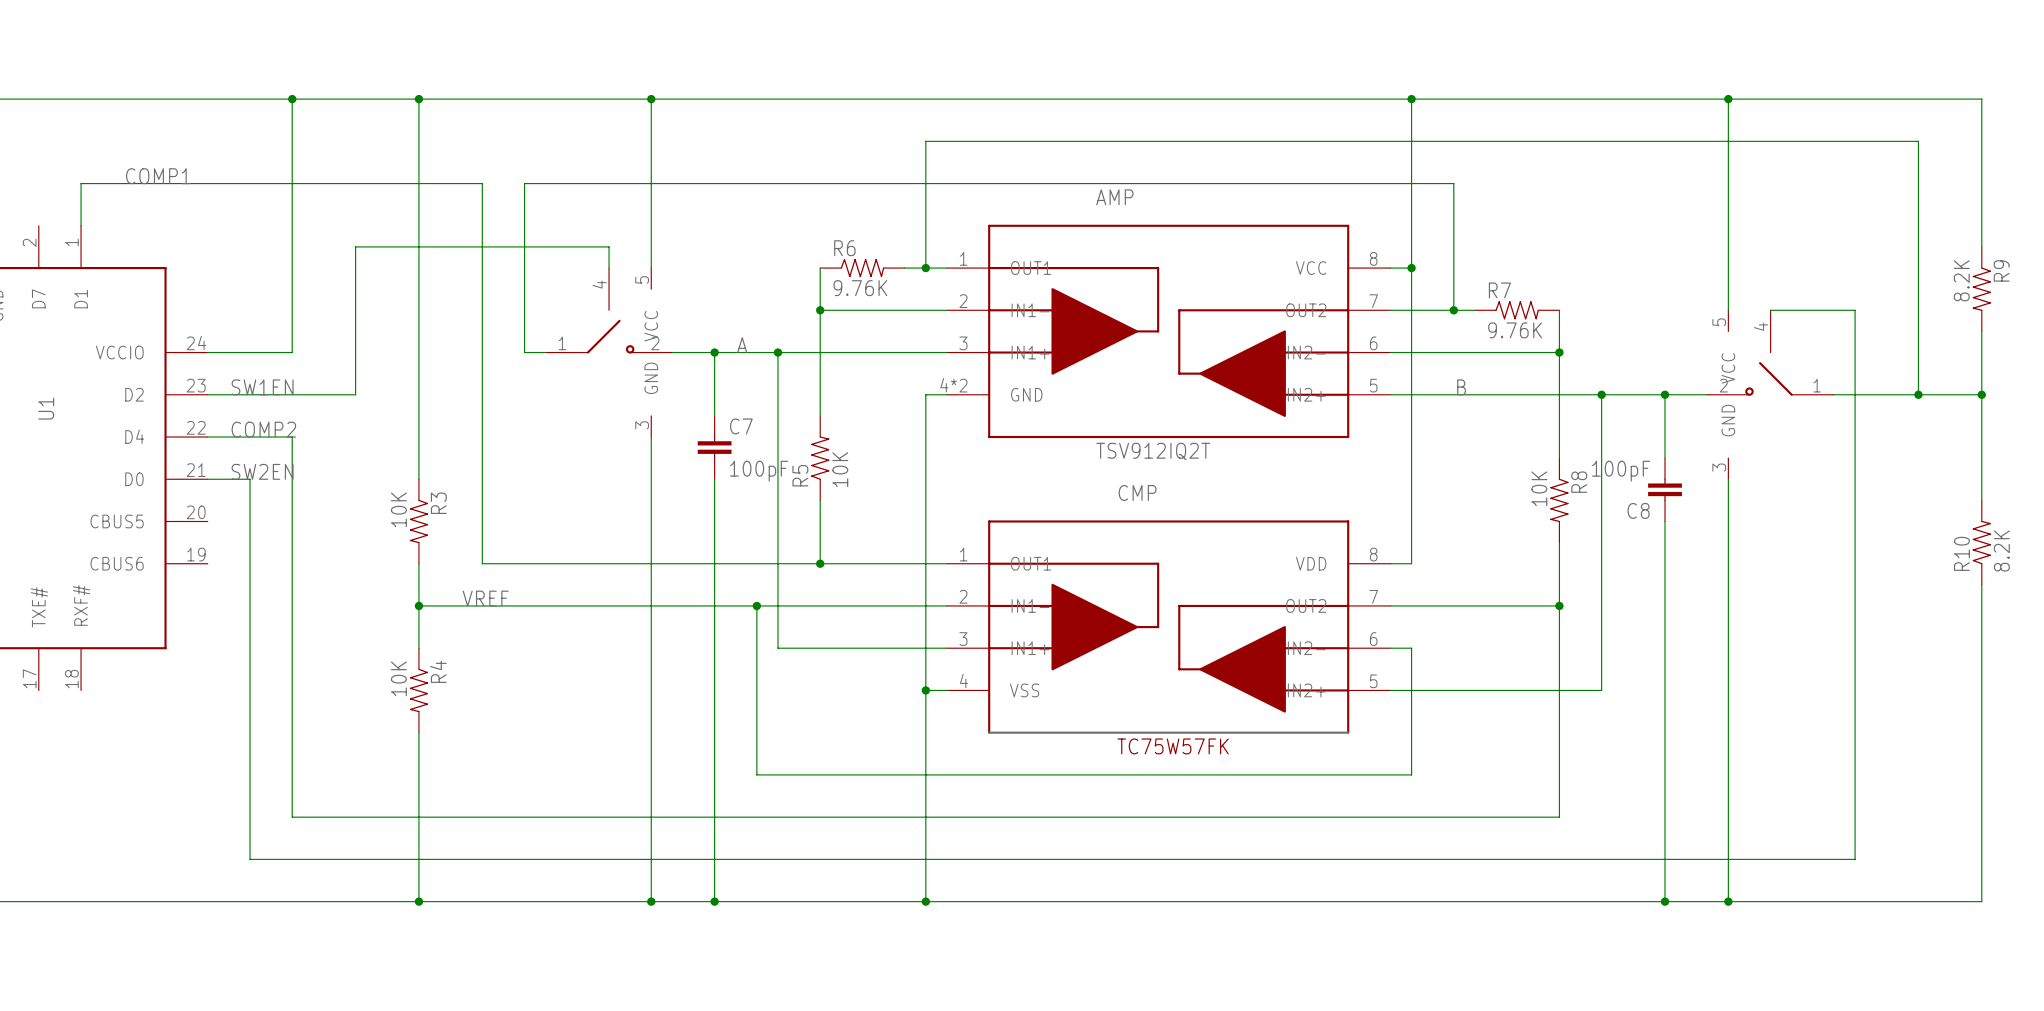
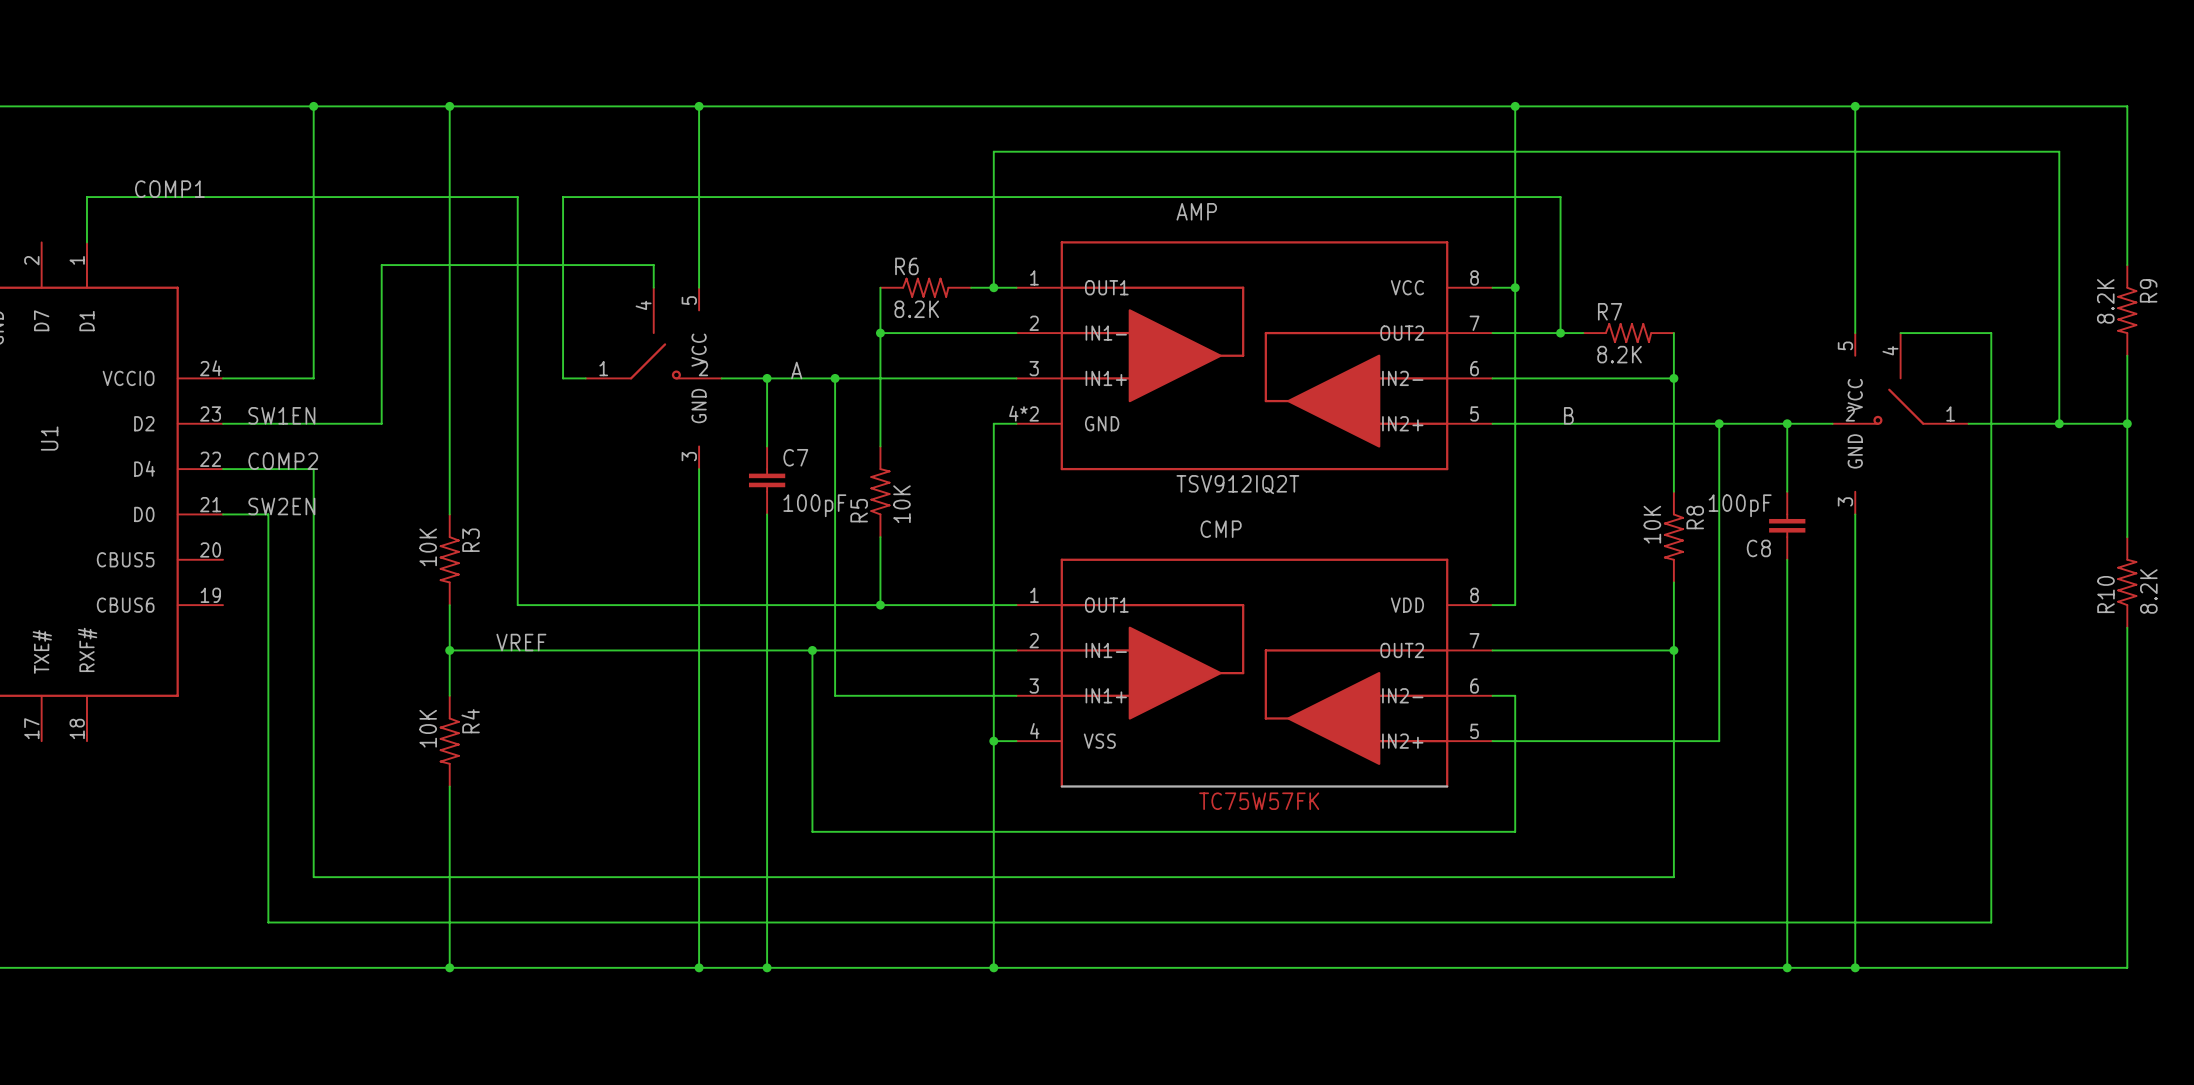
R6 value: 9.76K (860, 288) -> 8.2K (916, 309)
R7 value: 9.76K (1515, 330) -> 8.2K (1619, 354)

